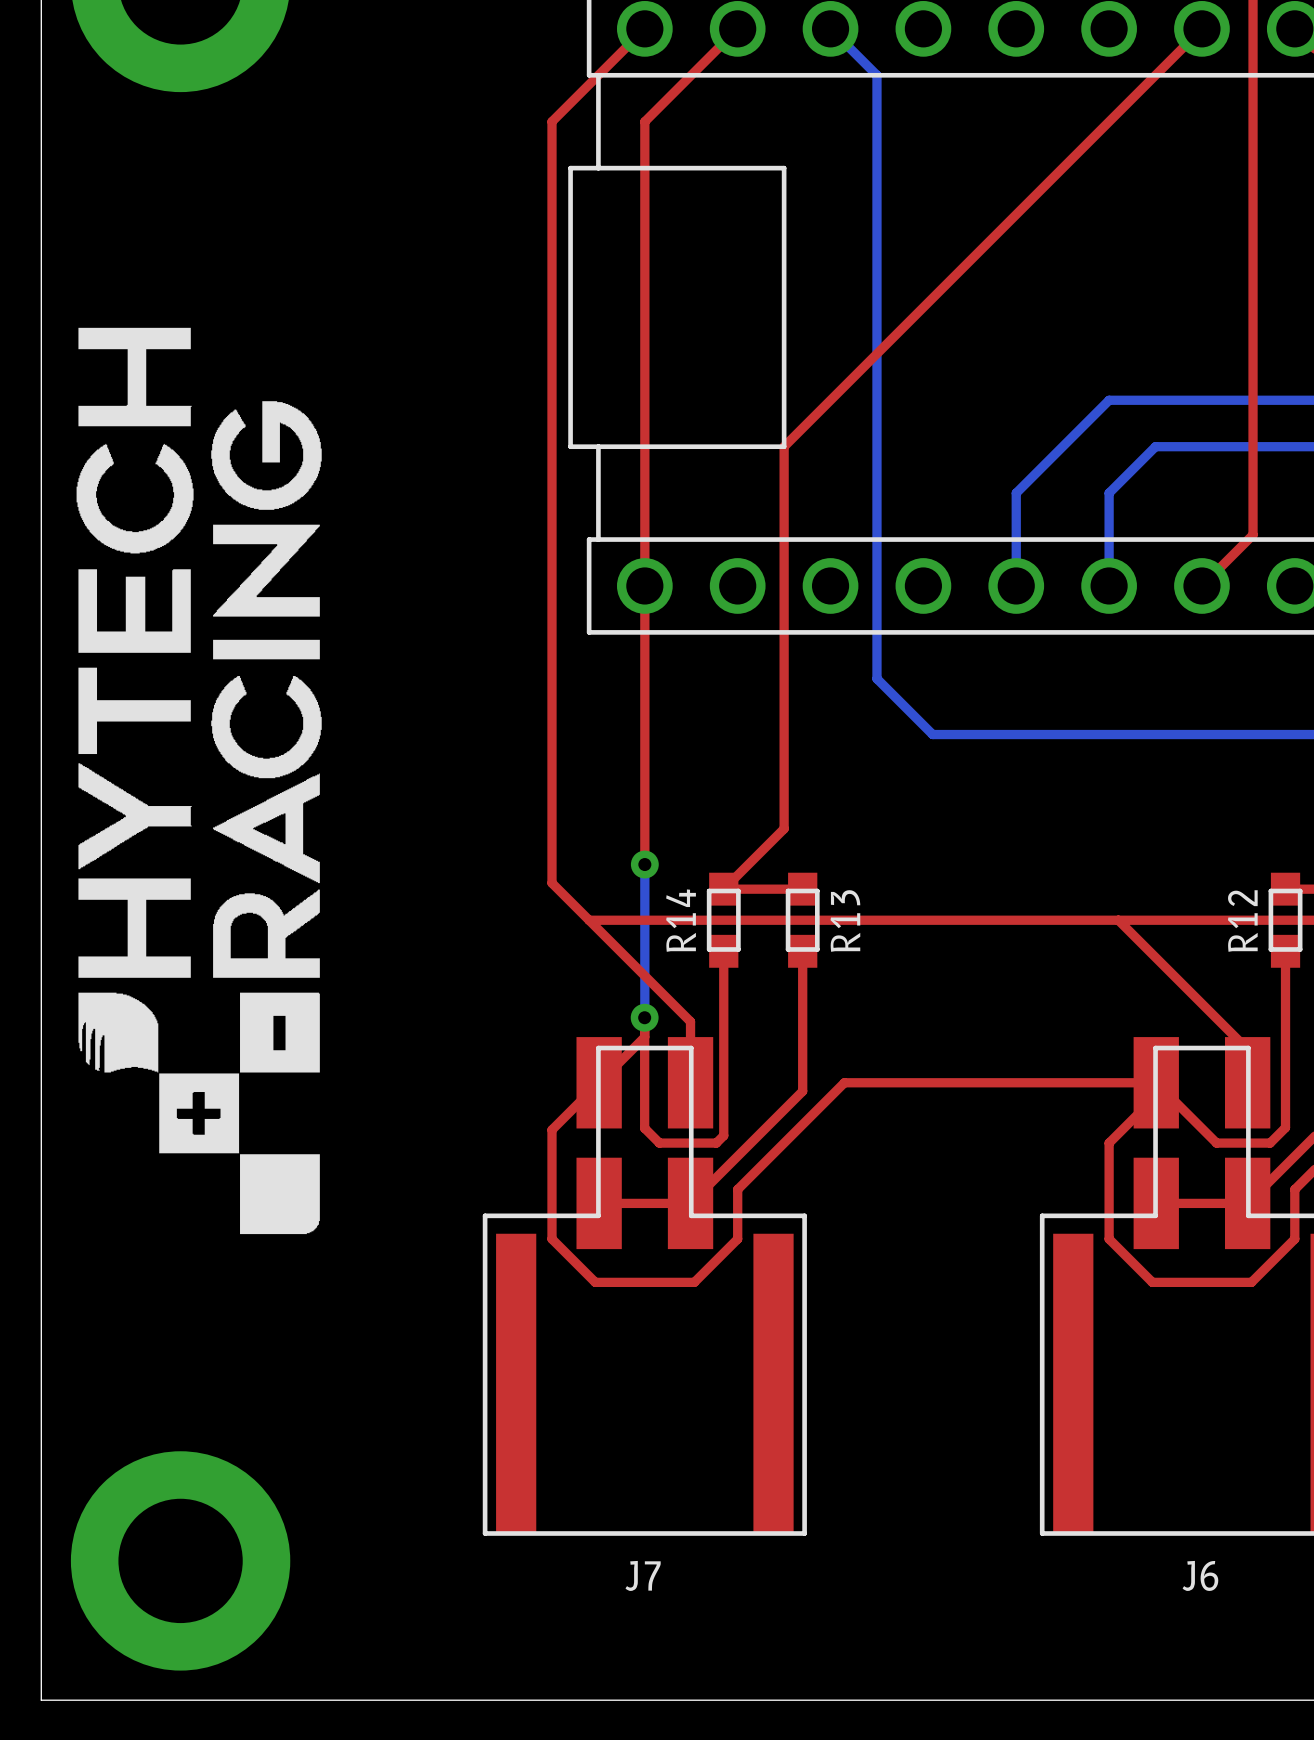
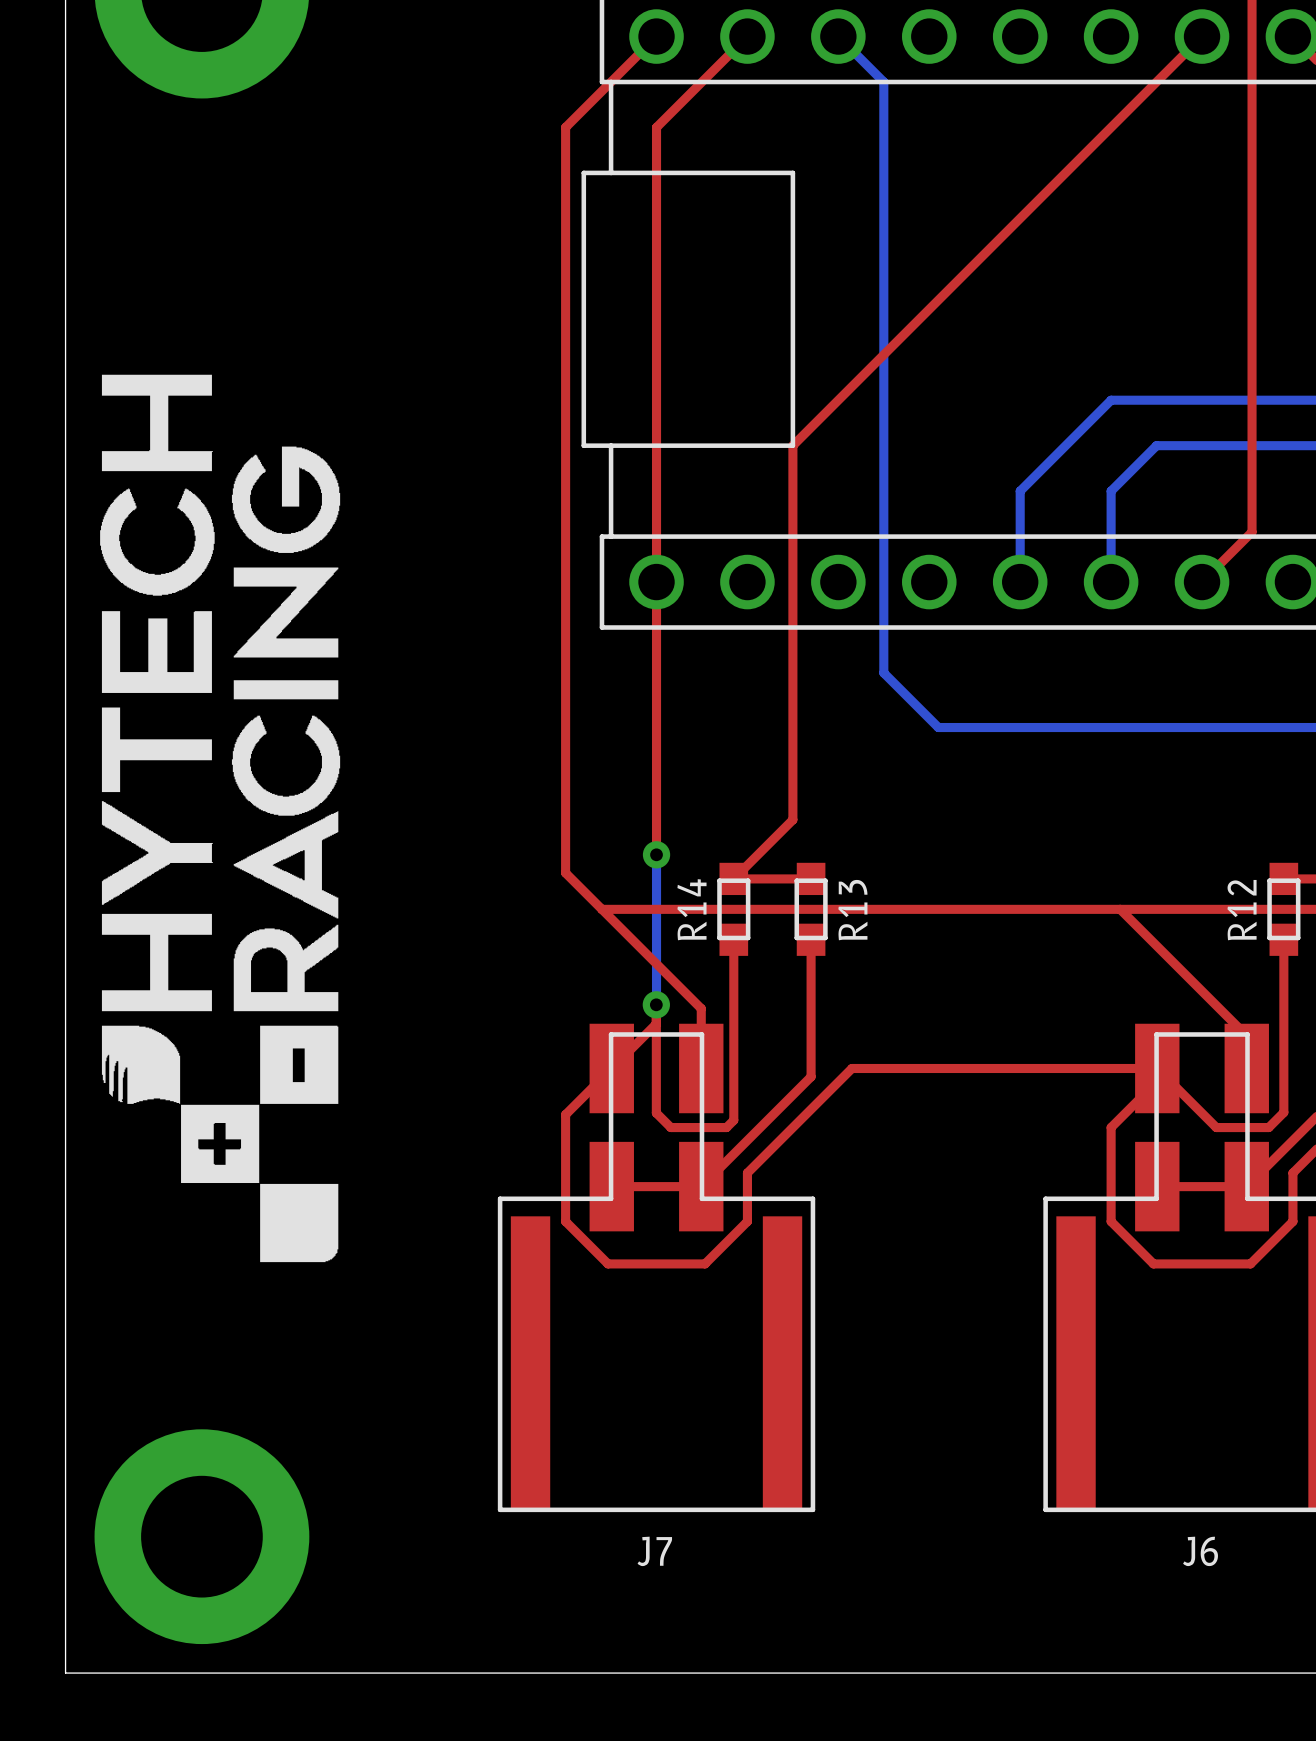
drawing position: (199, 780) -> (220, 818)

